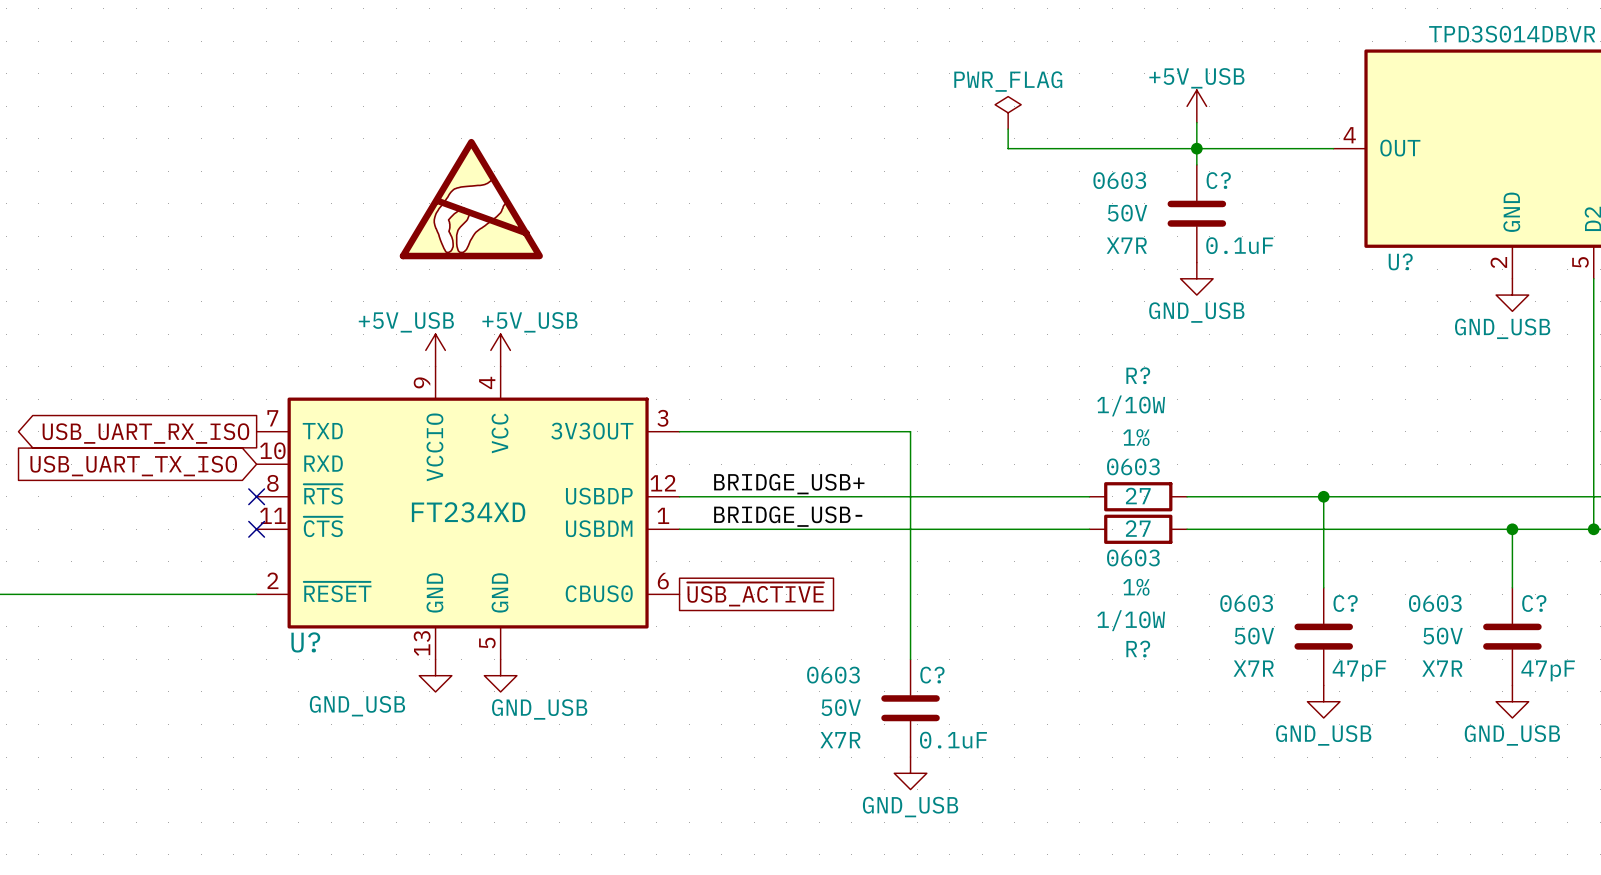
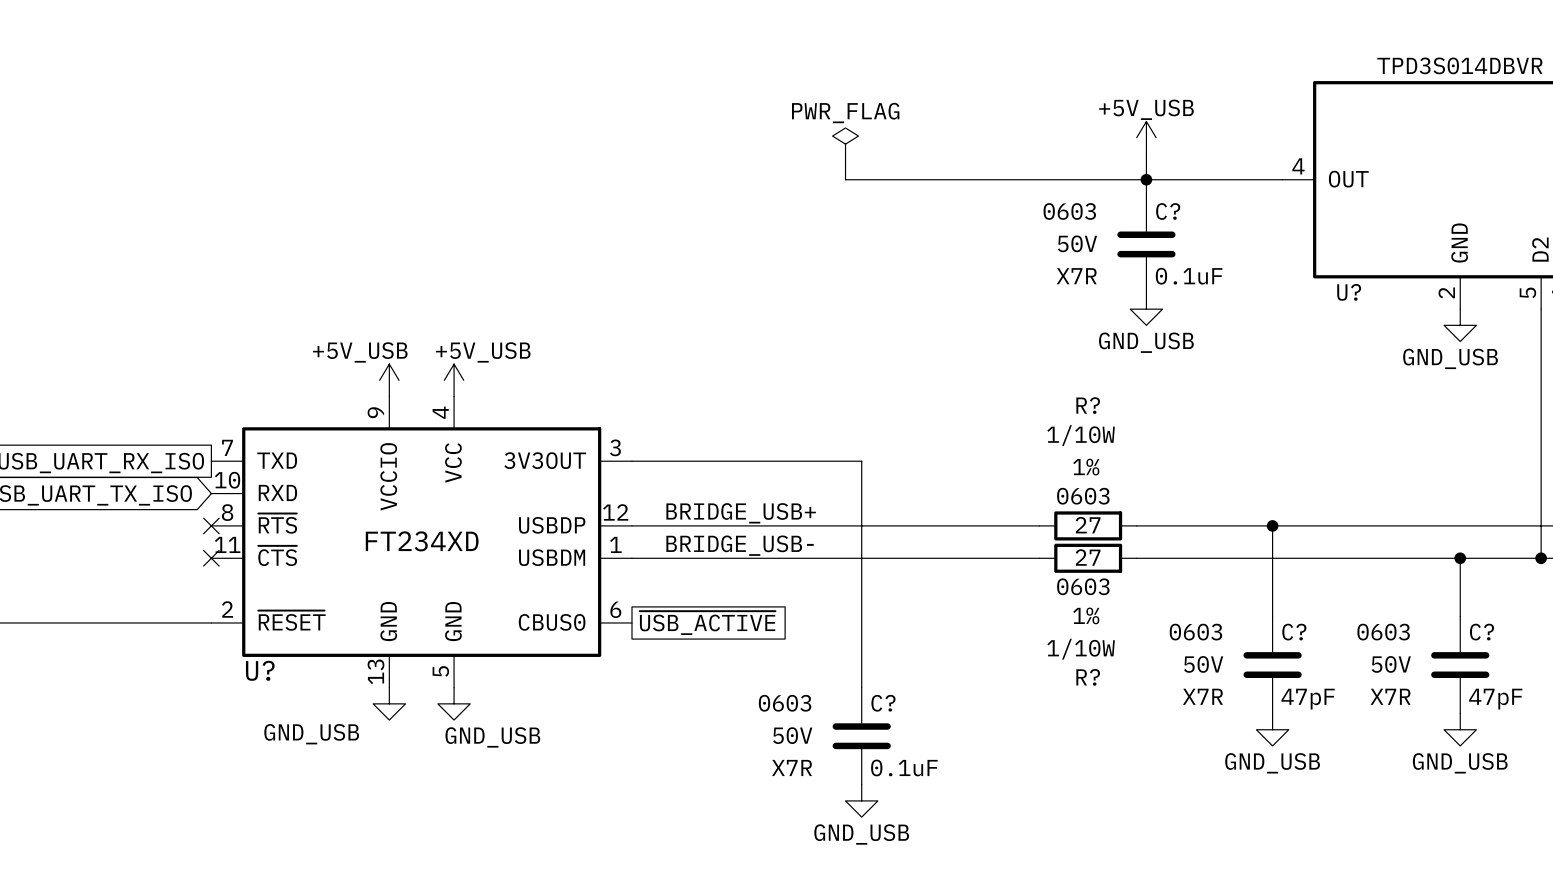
power symbol position: PWR_FLAG (1008, 112) -> PWR_FLAG (845, 144)
wire: (1008, 129) (1008, 148) -> (845, 160) (845, 179) (958, 179)
power symbol: (471, 199) -> none

